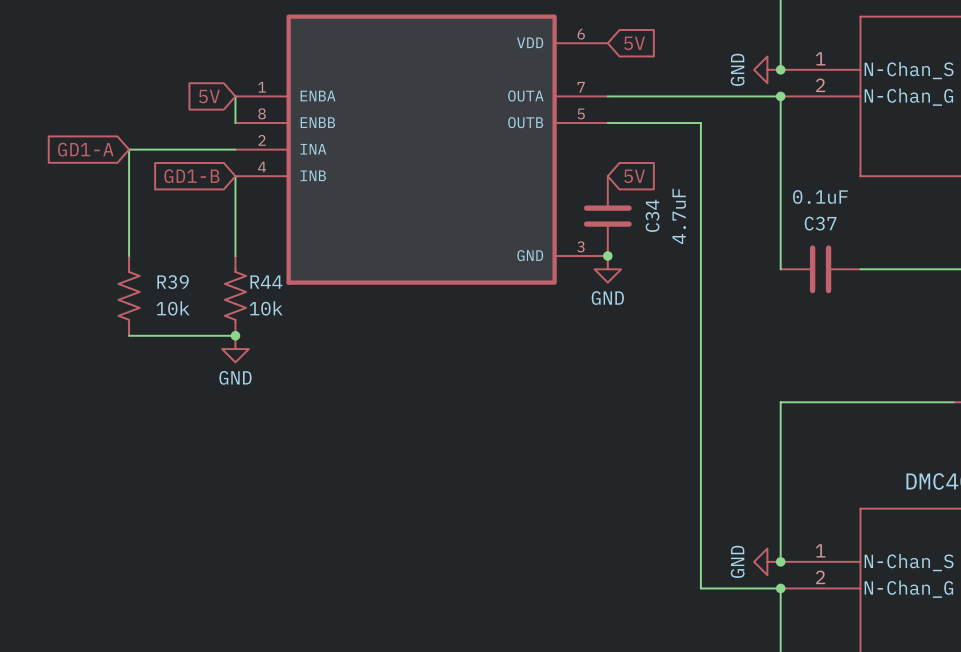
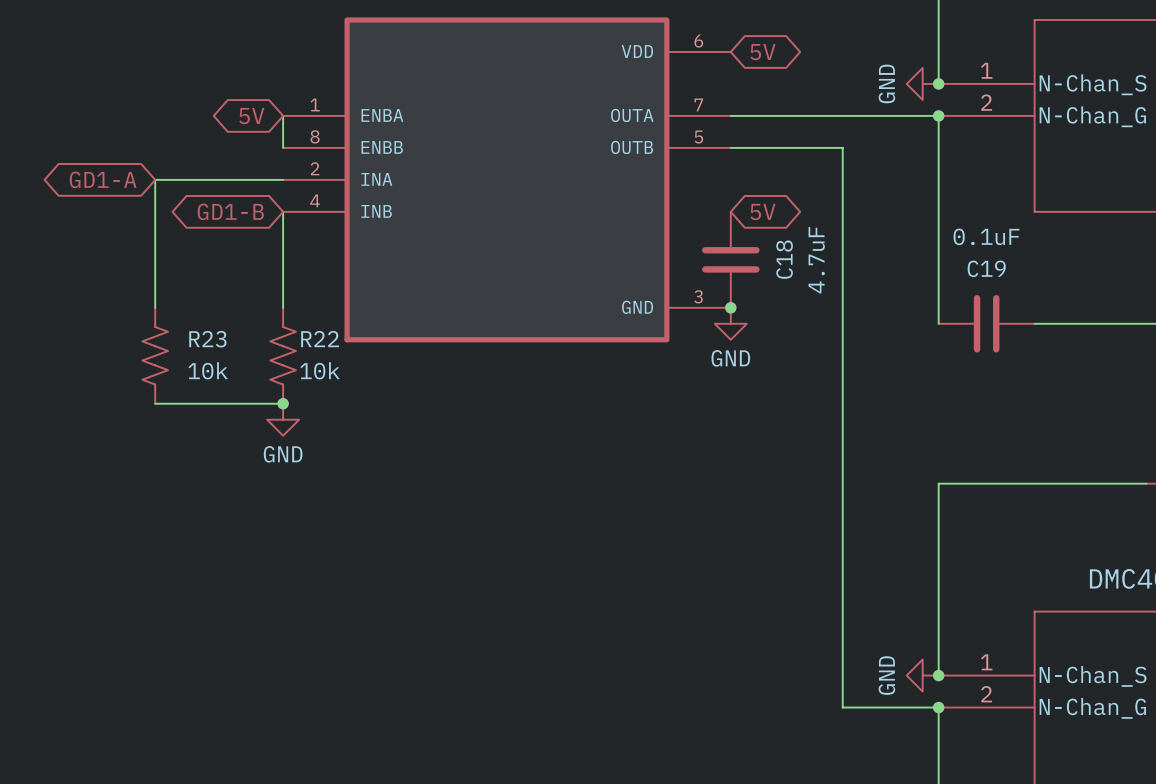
global label shape: input (634, 43) -> bidirectional (762, 52)
global label shape: input (209, 96) -> bidirectional (251, 116)
global label shape: input (85, 149) -> bidirectional (103, 179)
global label shape: input (191, 176) -> bidirectional (230, 211)
global label shape: input (634, 176) -> bidirectional (762, 212)
C34 name: C34 (652, 215) -> C18 (784, 259)
C37 name: C37 (820, 223) -> C19 (986, 268)
R39 name: R39 (173, 282) -> R23 (207, 339)
R44 name: R44 (266, 282) -> R22 (320, 339)

